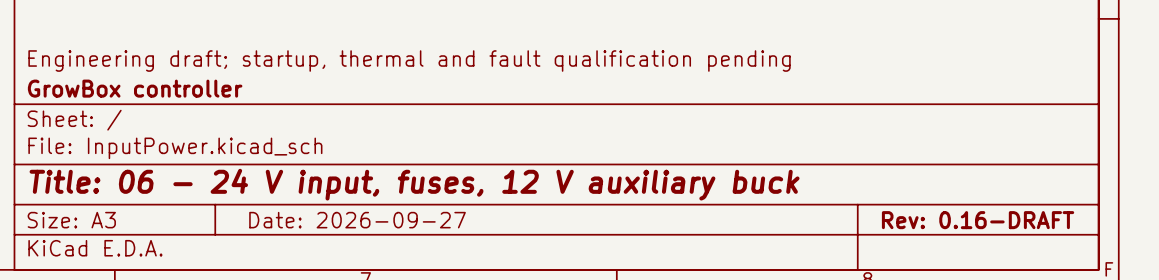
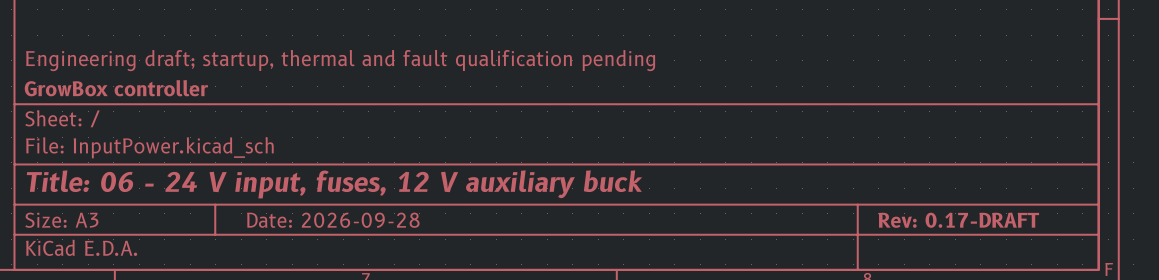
title block: Date: 2026-09-27 (357, 220) -> Date: 2026-09-28 (333, 220)
title block: Rev: 0.16-DRAFT (978, 220) -> Rev: 0.17-DRAFT (958, 220)

